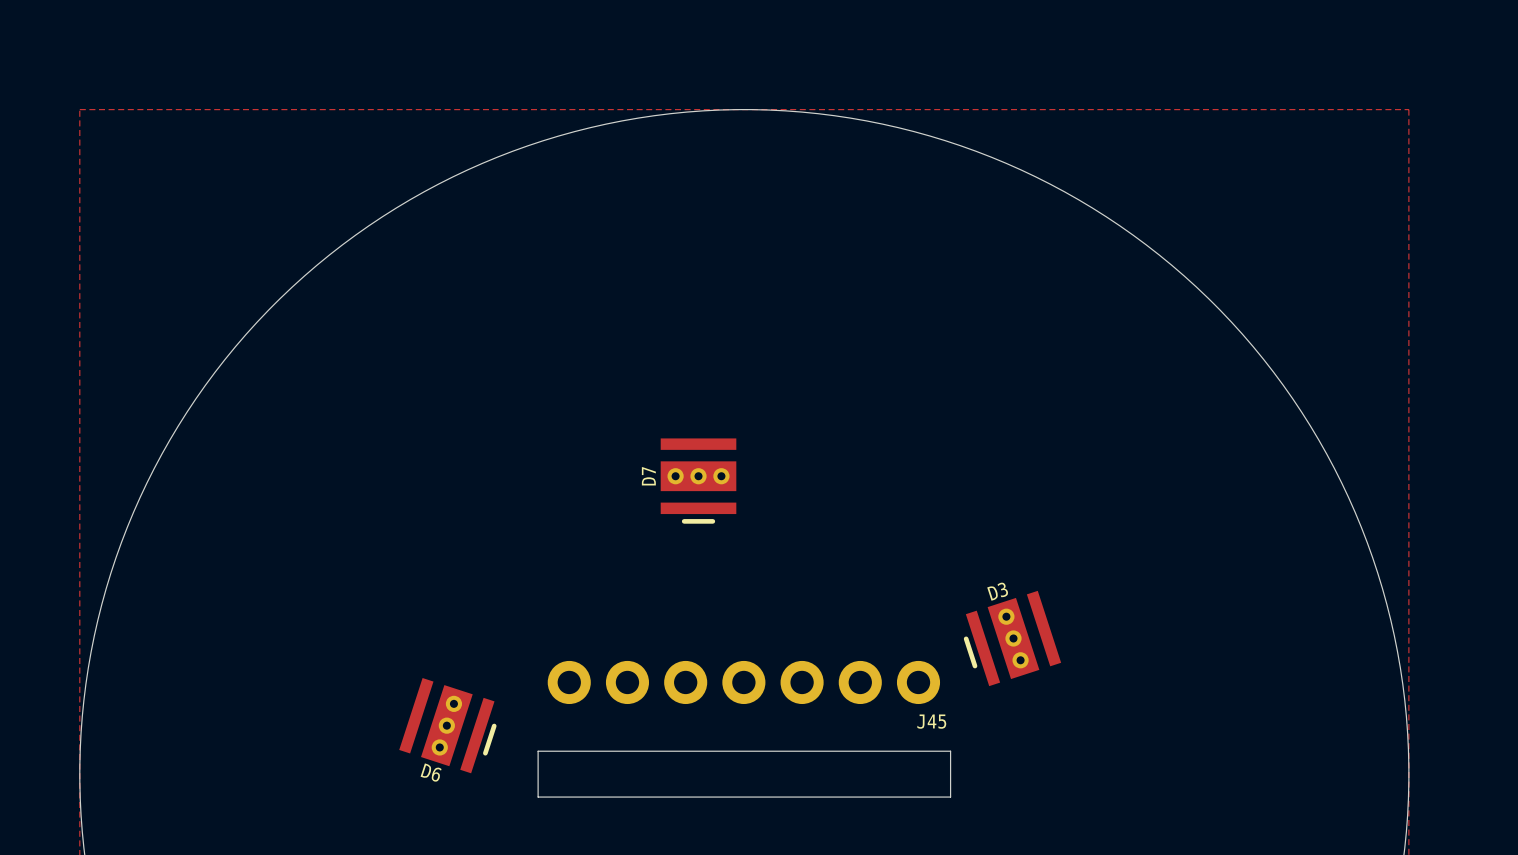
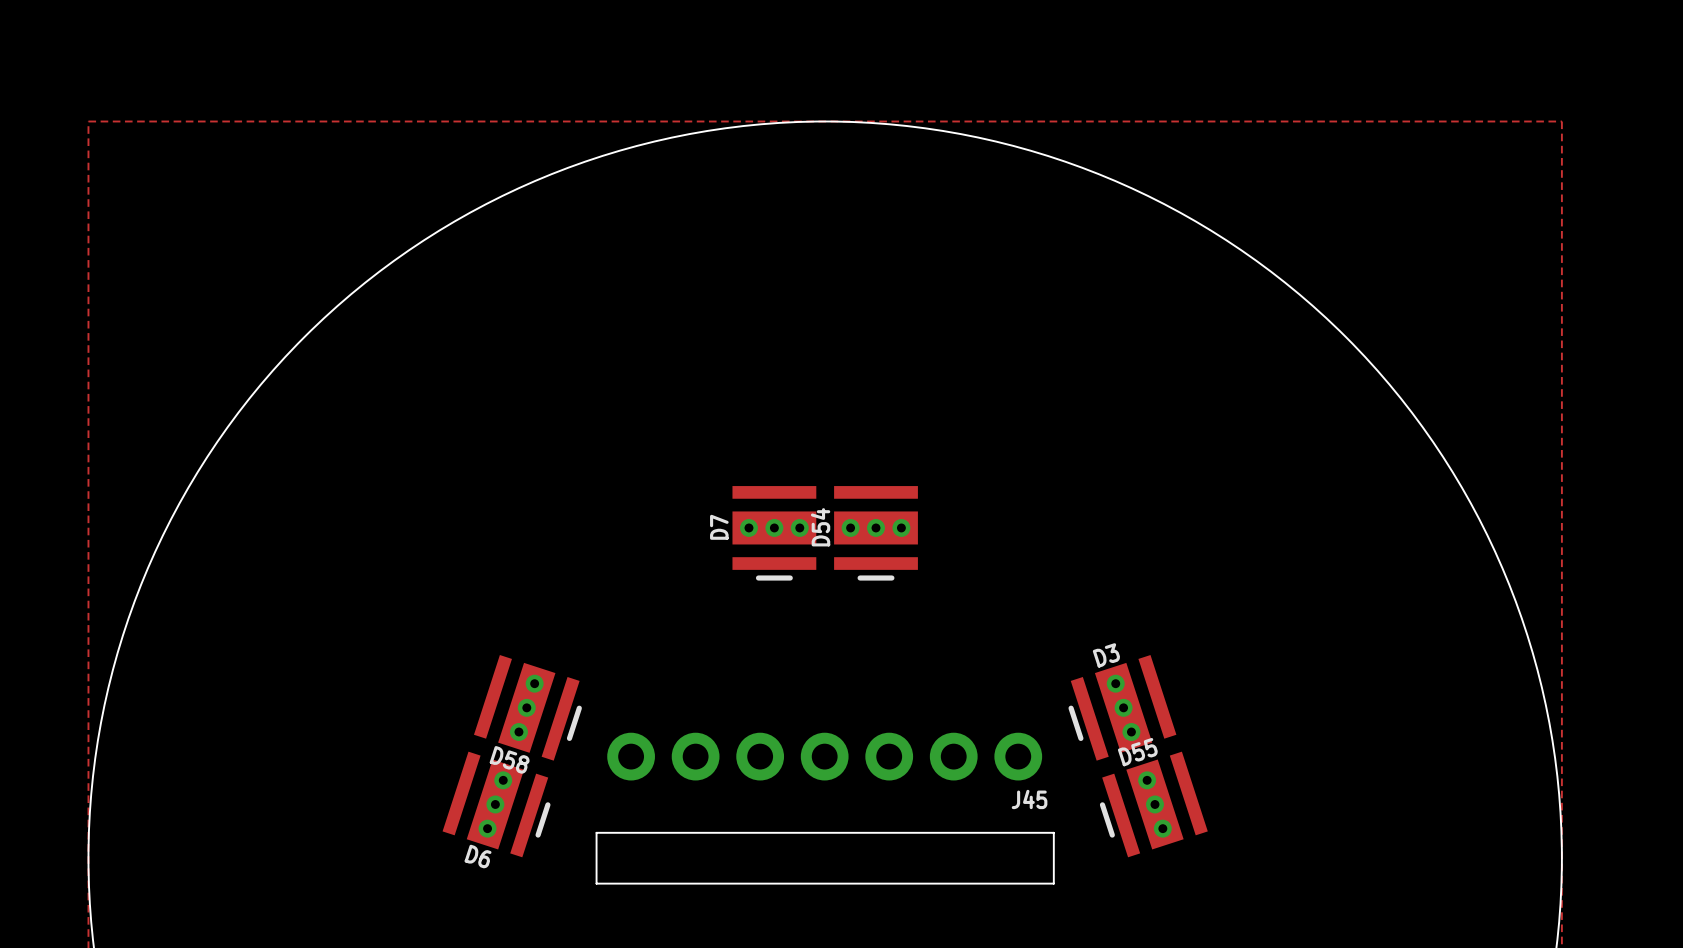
D54: none -> (876, 533)
D58: none -> (527, 707)
D55: none -> (1153, 804)

